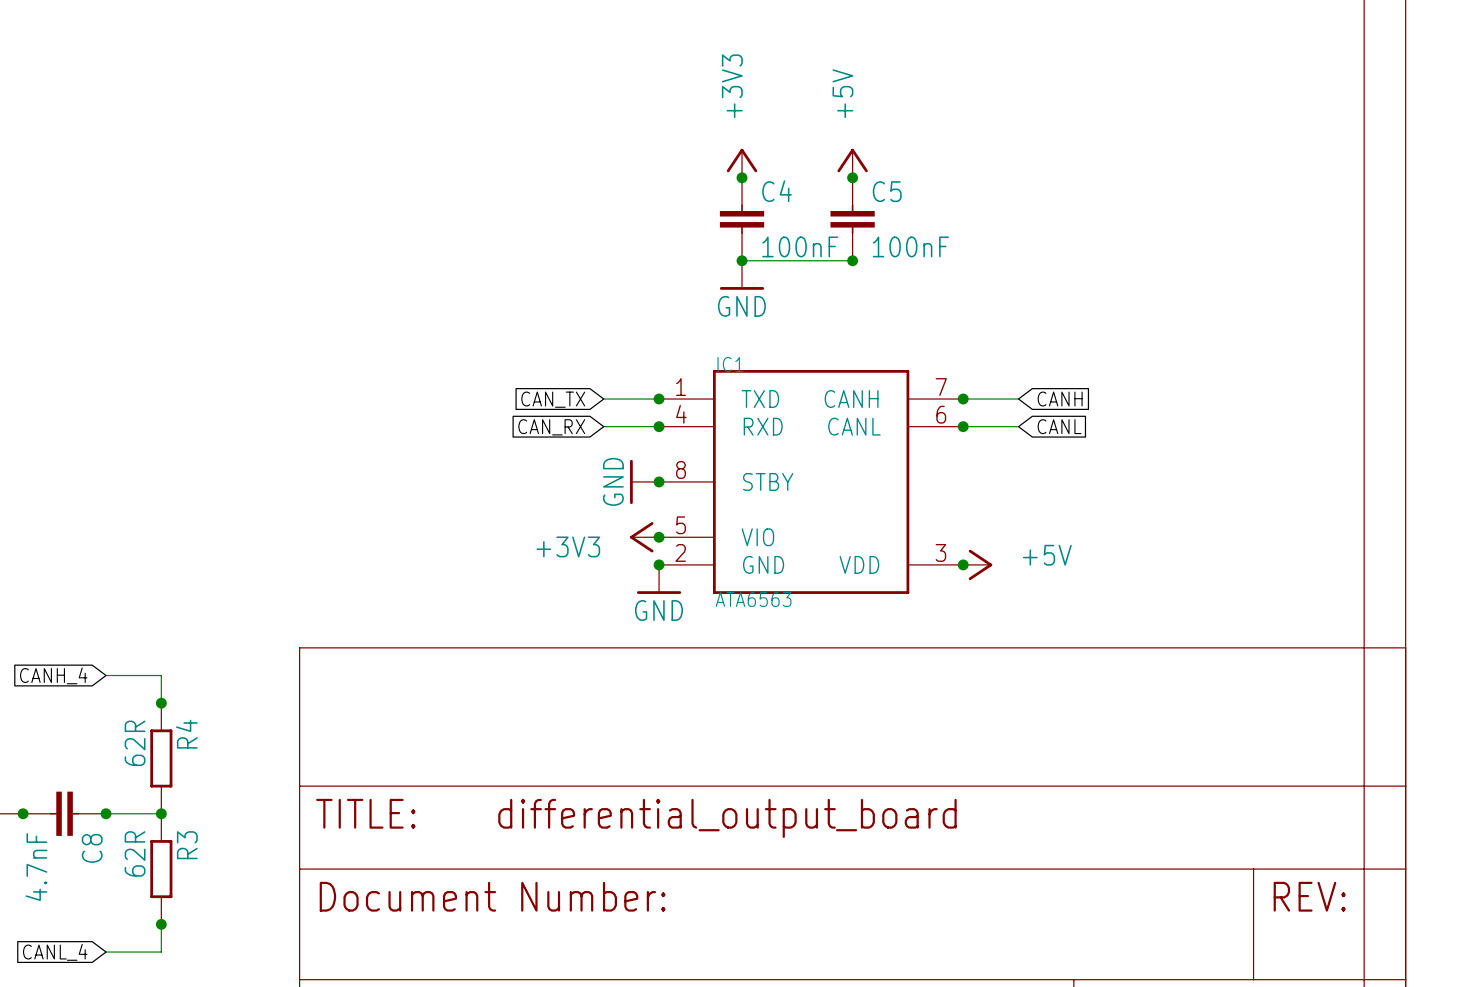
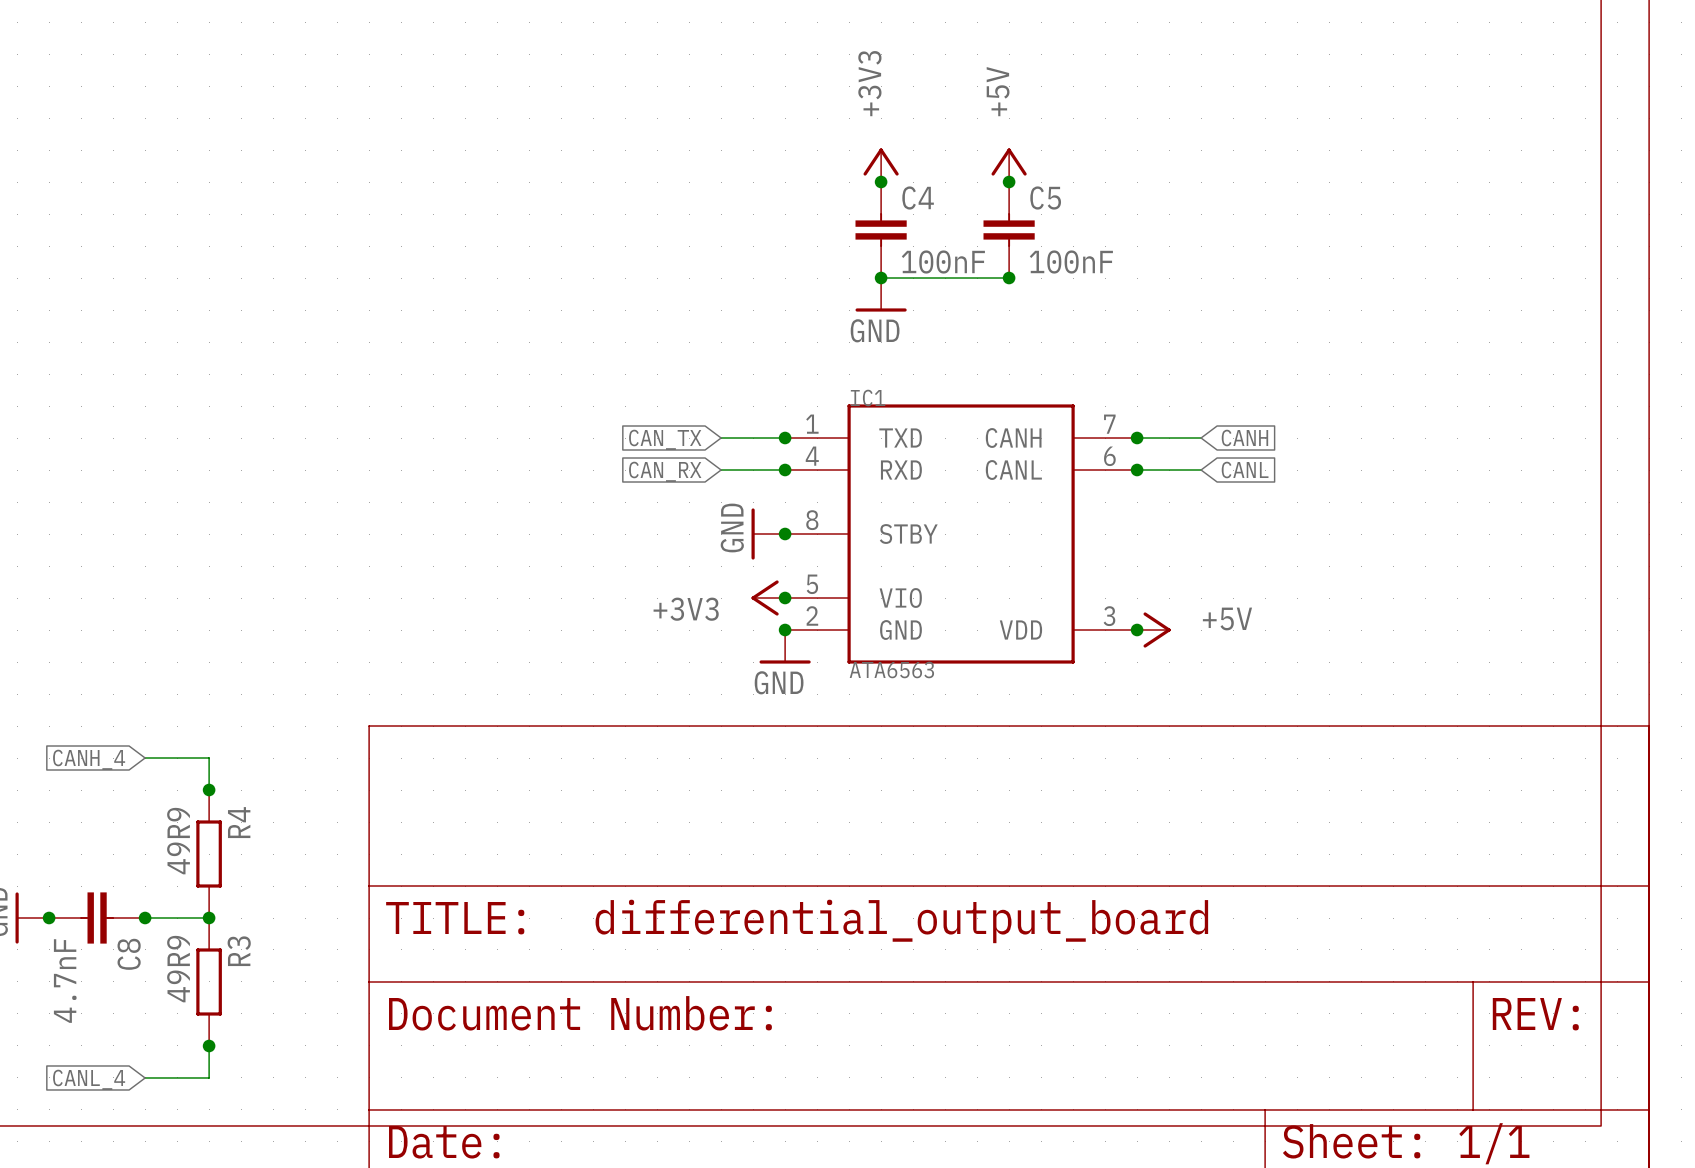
R4 value: 62R (135, 743) -> 49R9 (178, 841)
R3 value: 62R (135, 853) -> 49R9 (178, 969)

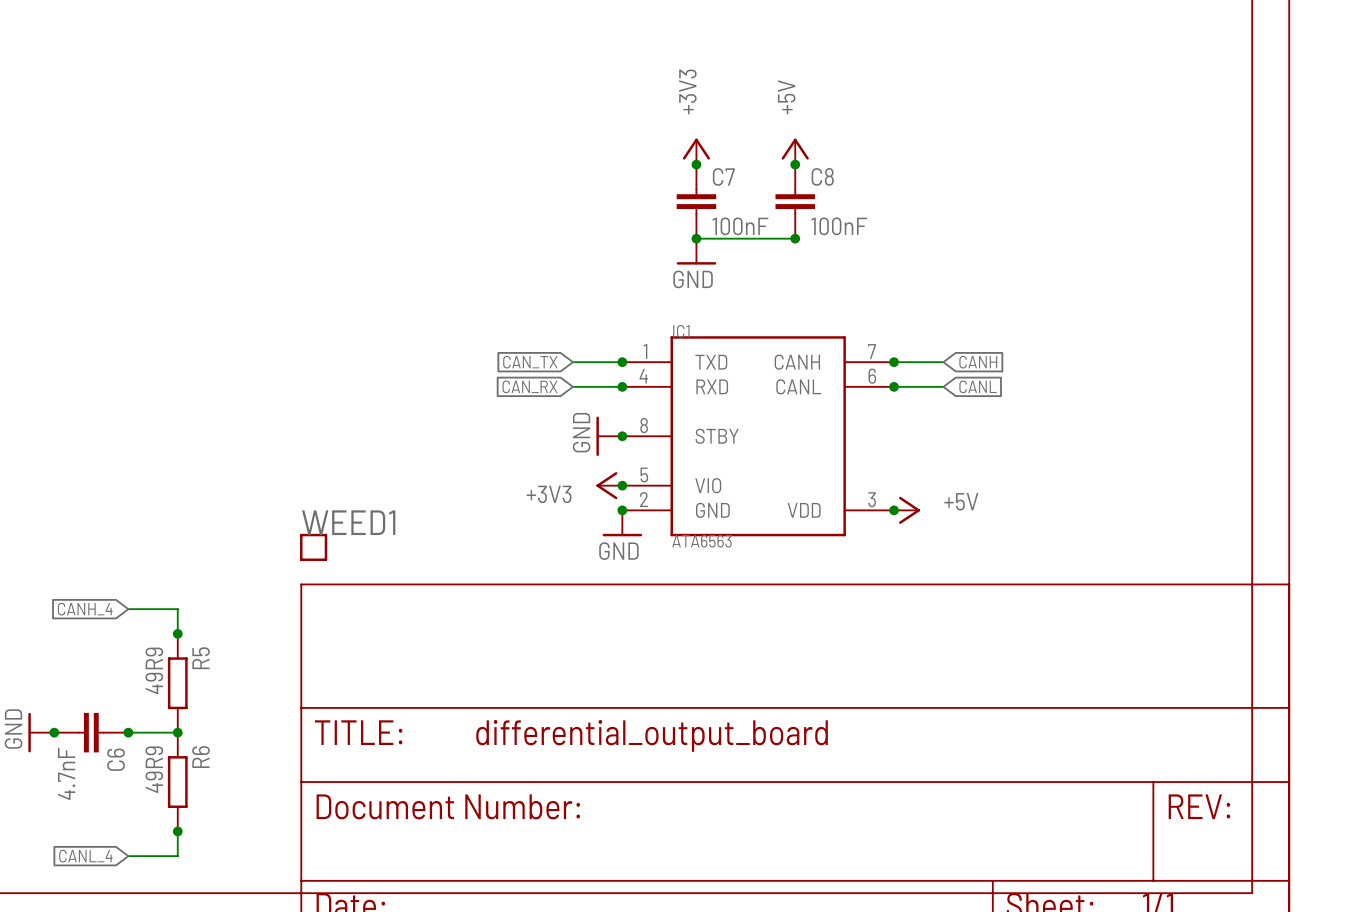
C4 name: C4 (918, 198) -> C7 (723, 176)
C5 name: C5 (1045, 198) -> C8 (822, 176)
WEED1: none -> (313, 547)
R4 name: R4 (239, 822) -> R5 (201, 658)
R3 name: R3 (239, 951) -> R6 (200, 757)
C8 name: C8 (129, 954) -> C6 (116, 759)

